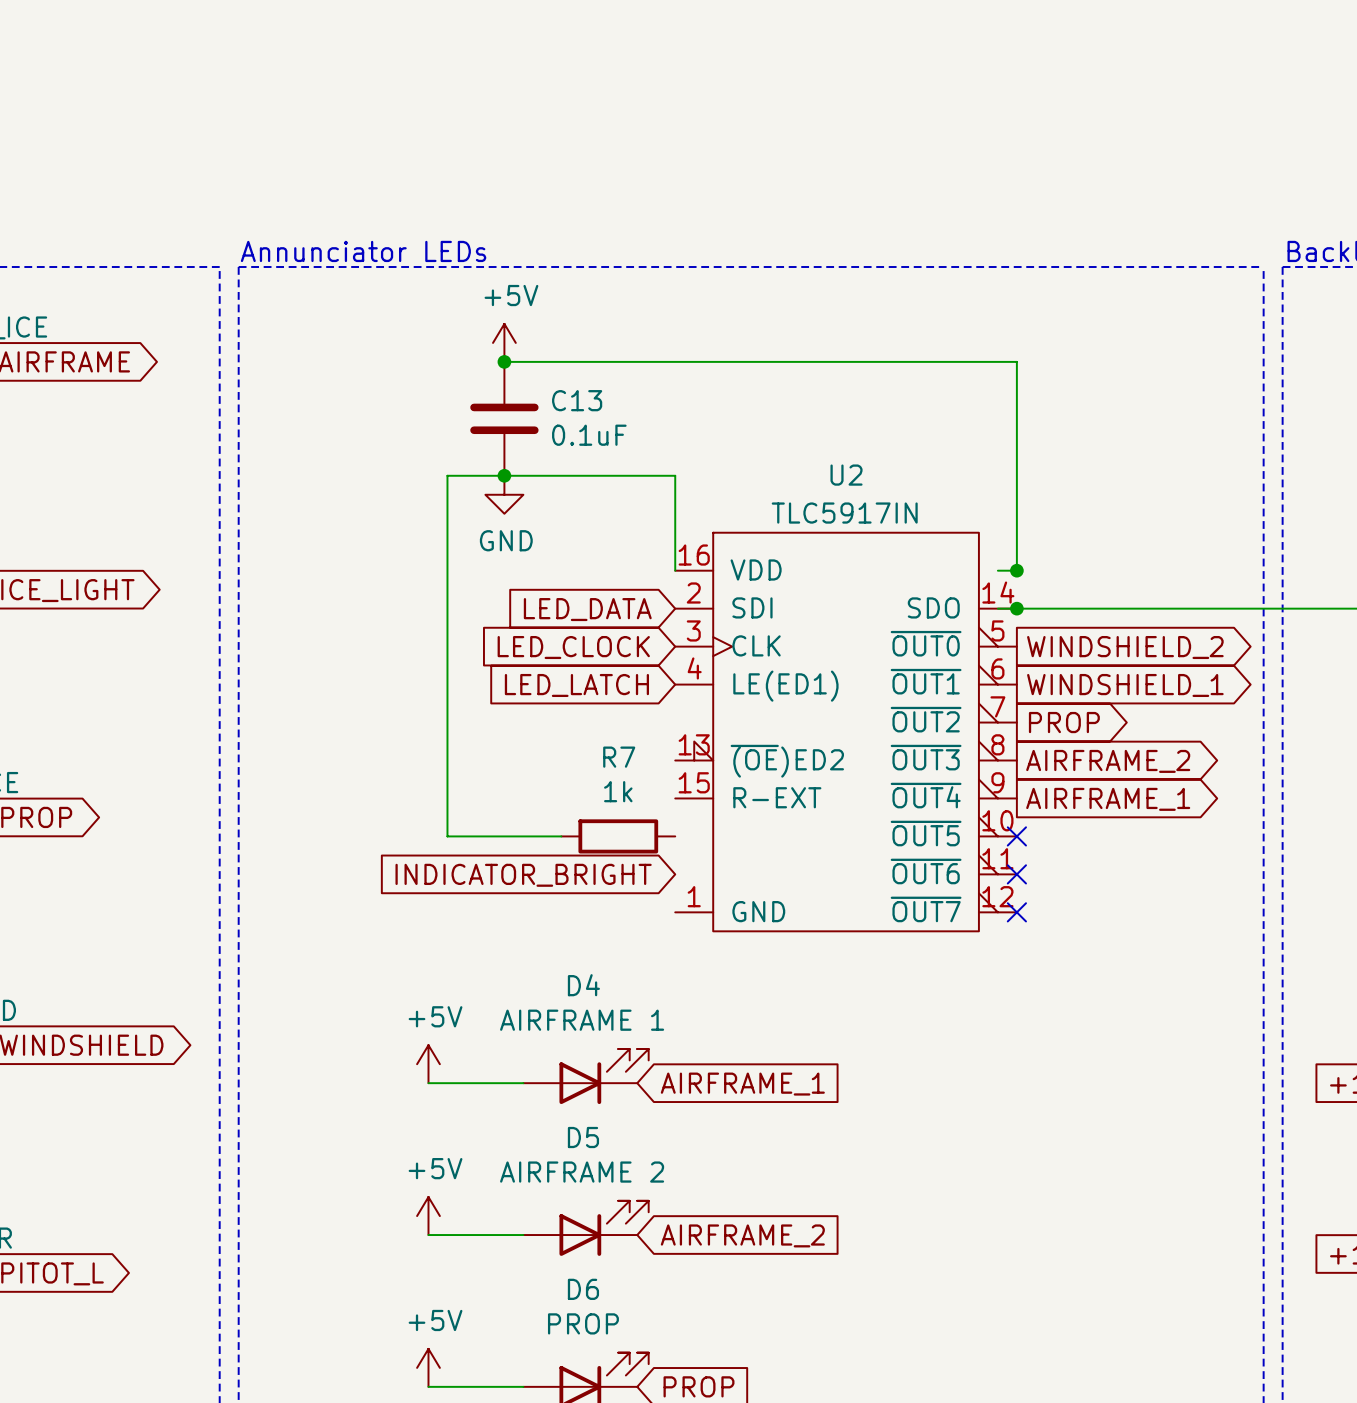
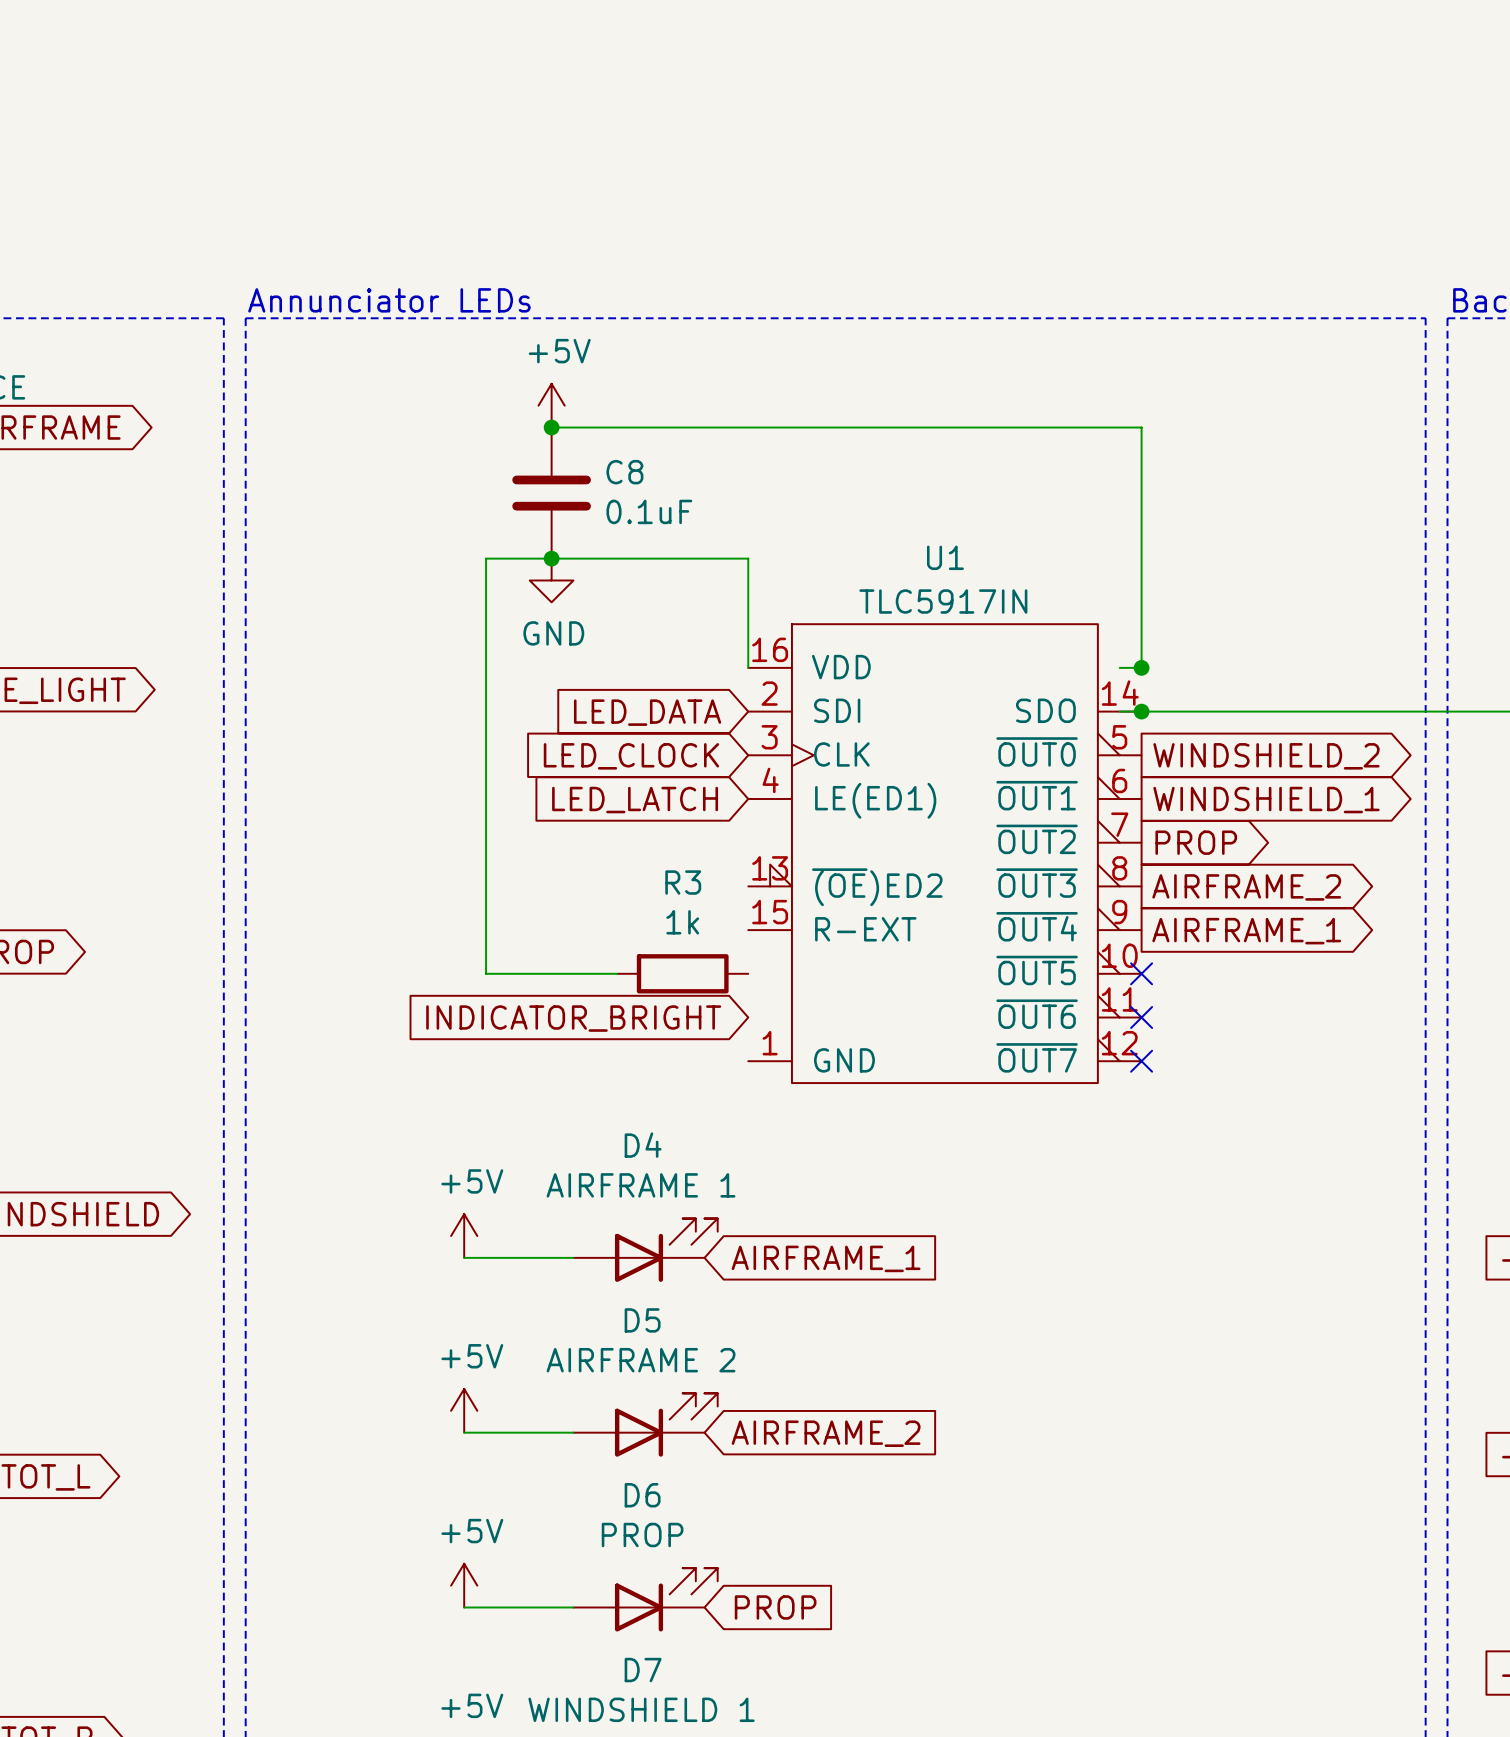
C13 name: C13 (577, 400) -> C8 (624, 472)
U2 name: U2 (846, 475) -> U1 (945, 557)
R7 name: R7 (619, 757) -> R3 (683, 882)

